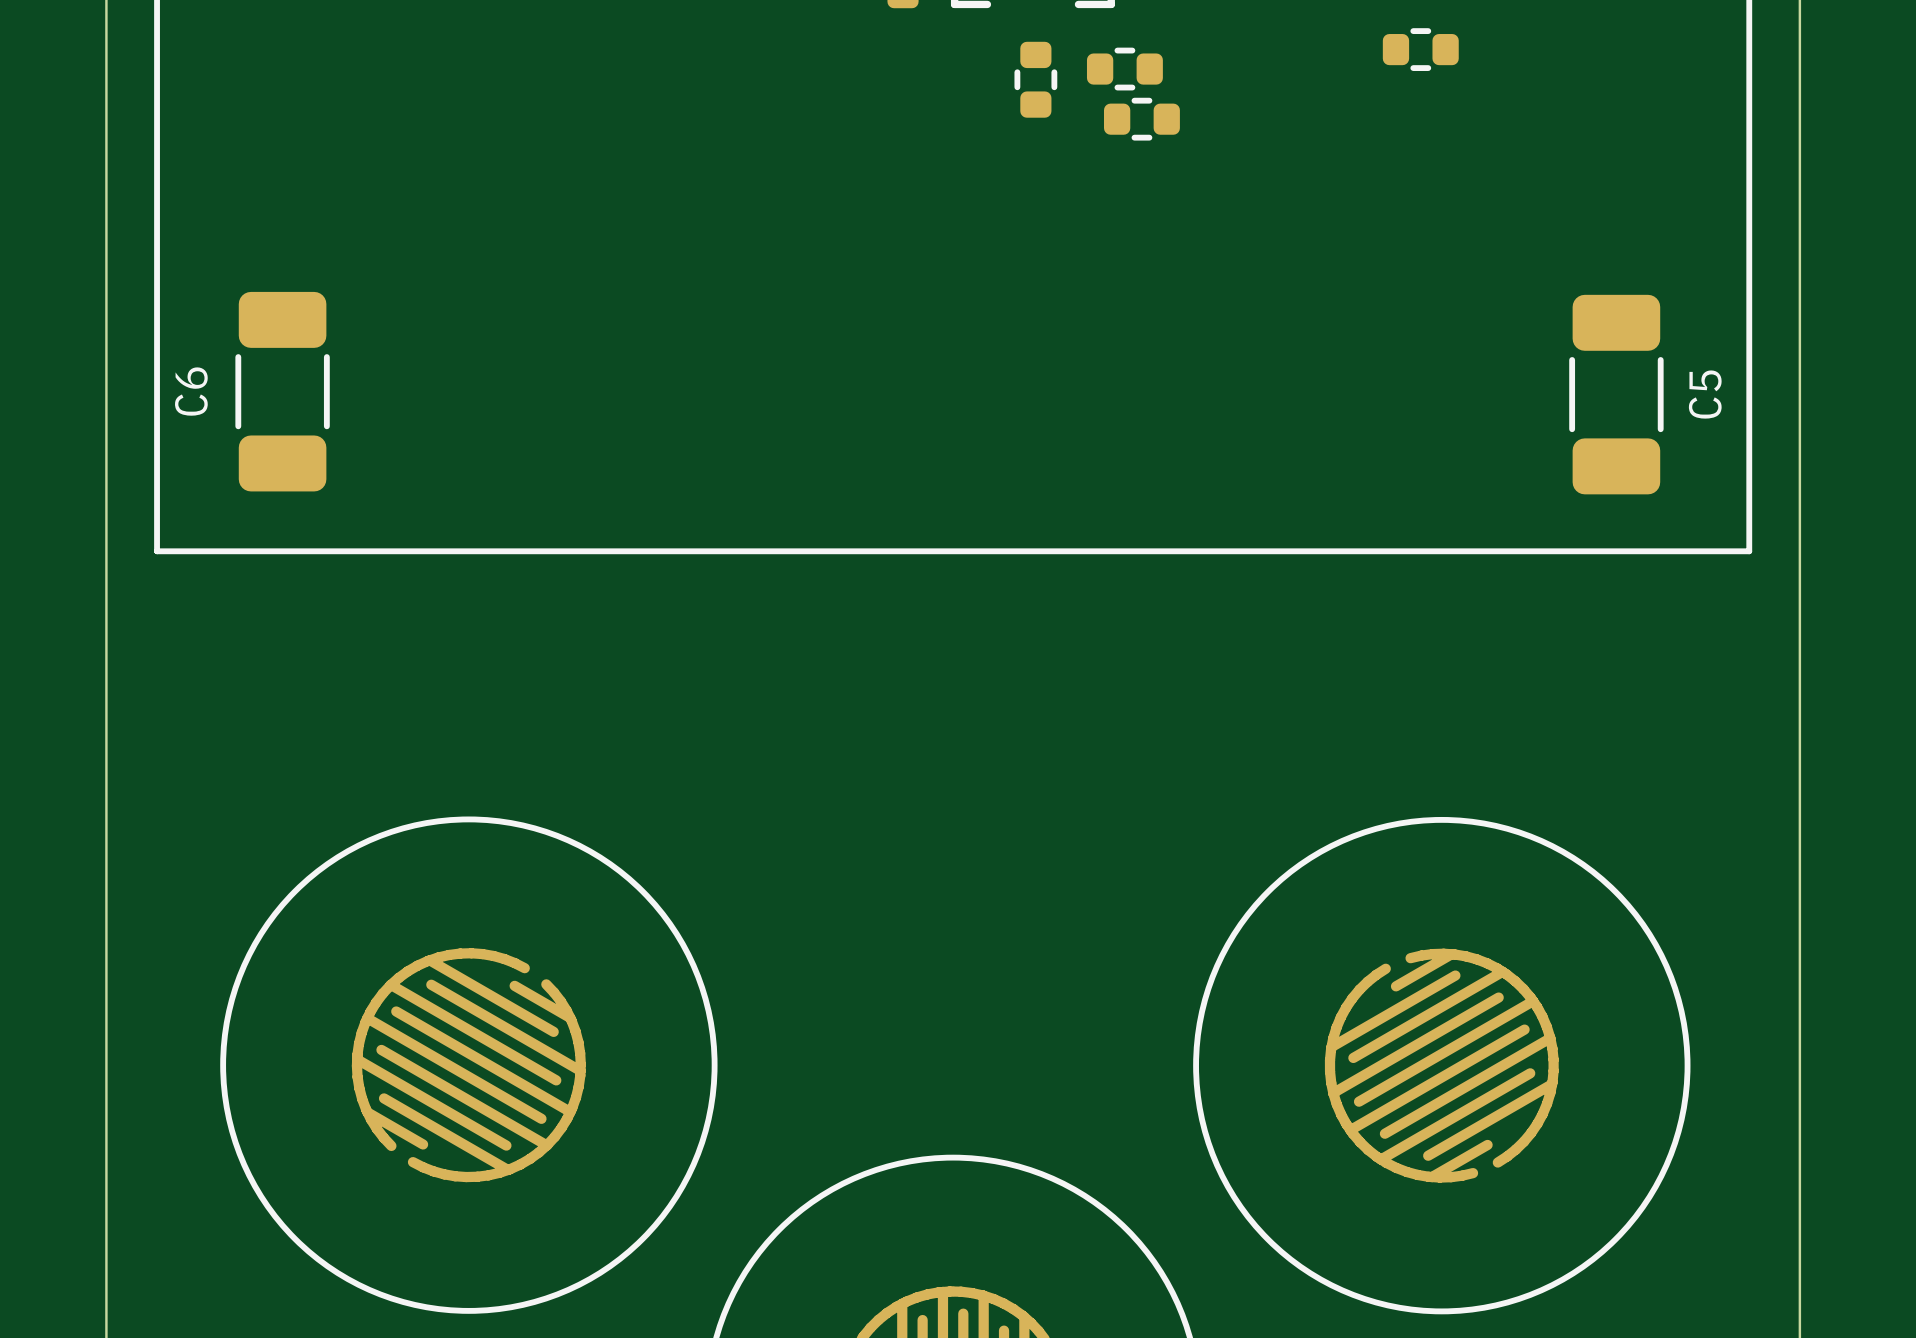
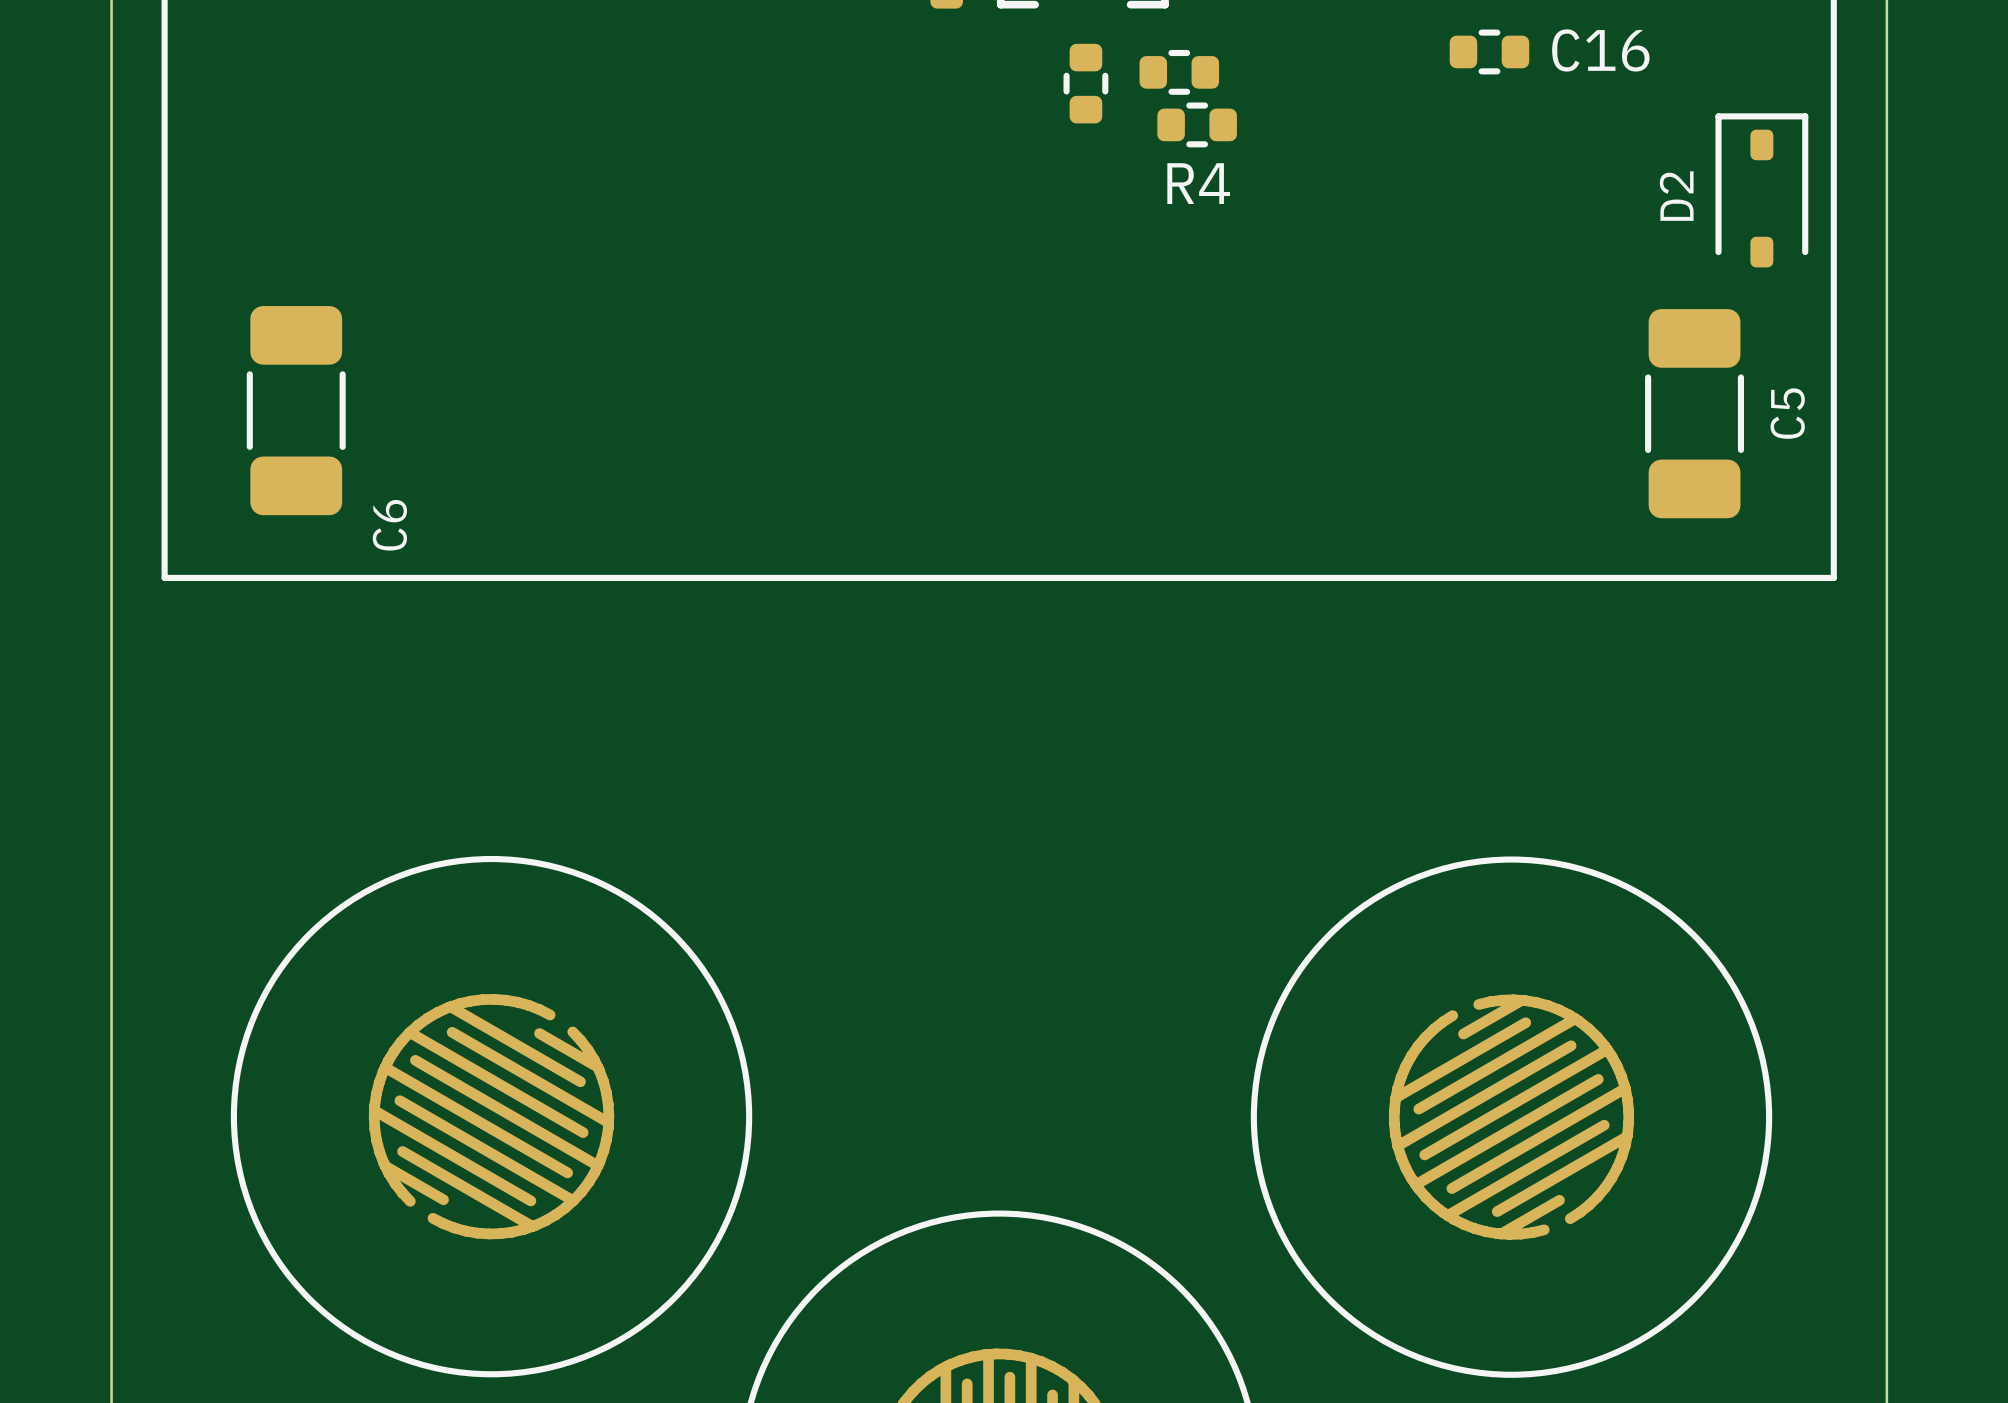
C16 name: none -> C16 (1600, 50)
R4 name: none -> R4 (1198, 183)
D2: none -> (1761, 190)
C6 name position: C6 (191, 391) -> C6 (389, 525)

